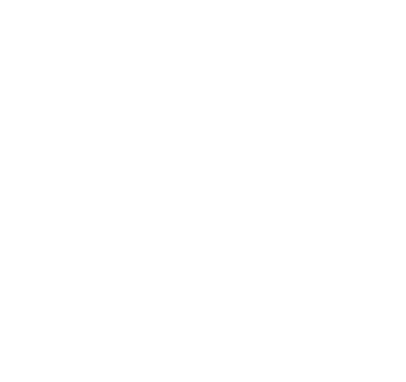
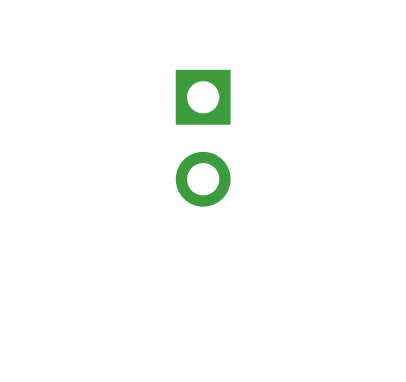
part: none -> (203, 138)

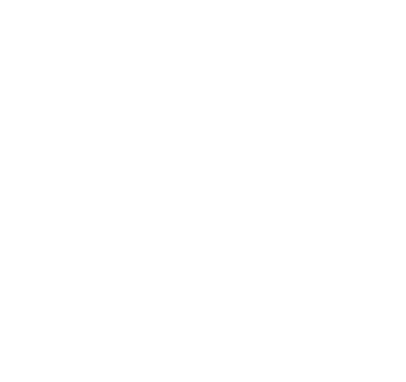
part: (203, 138) -> none

